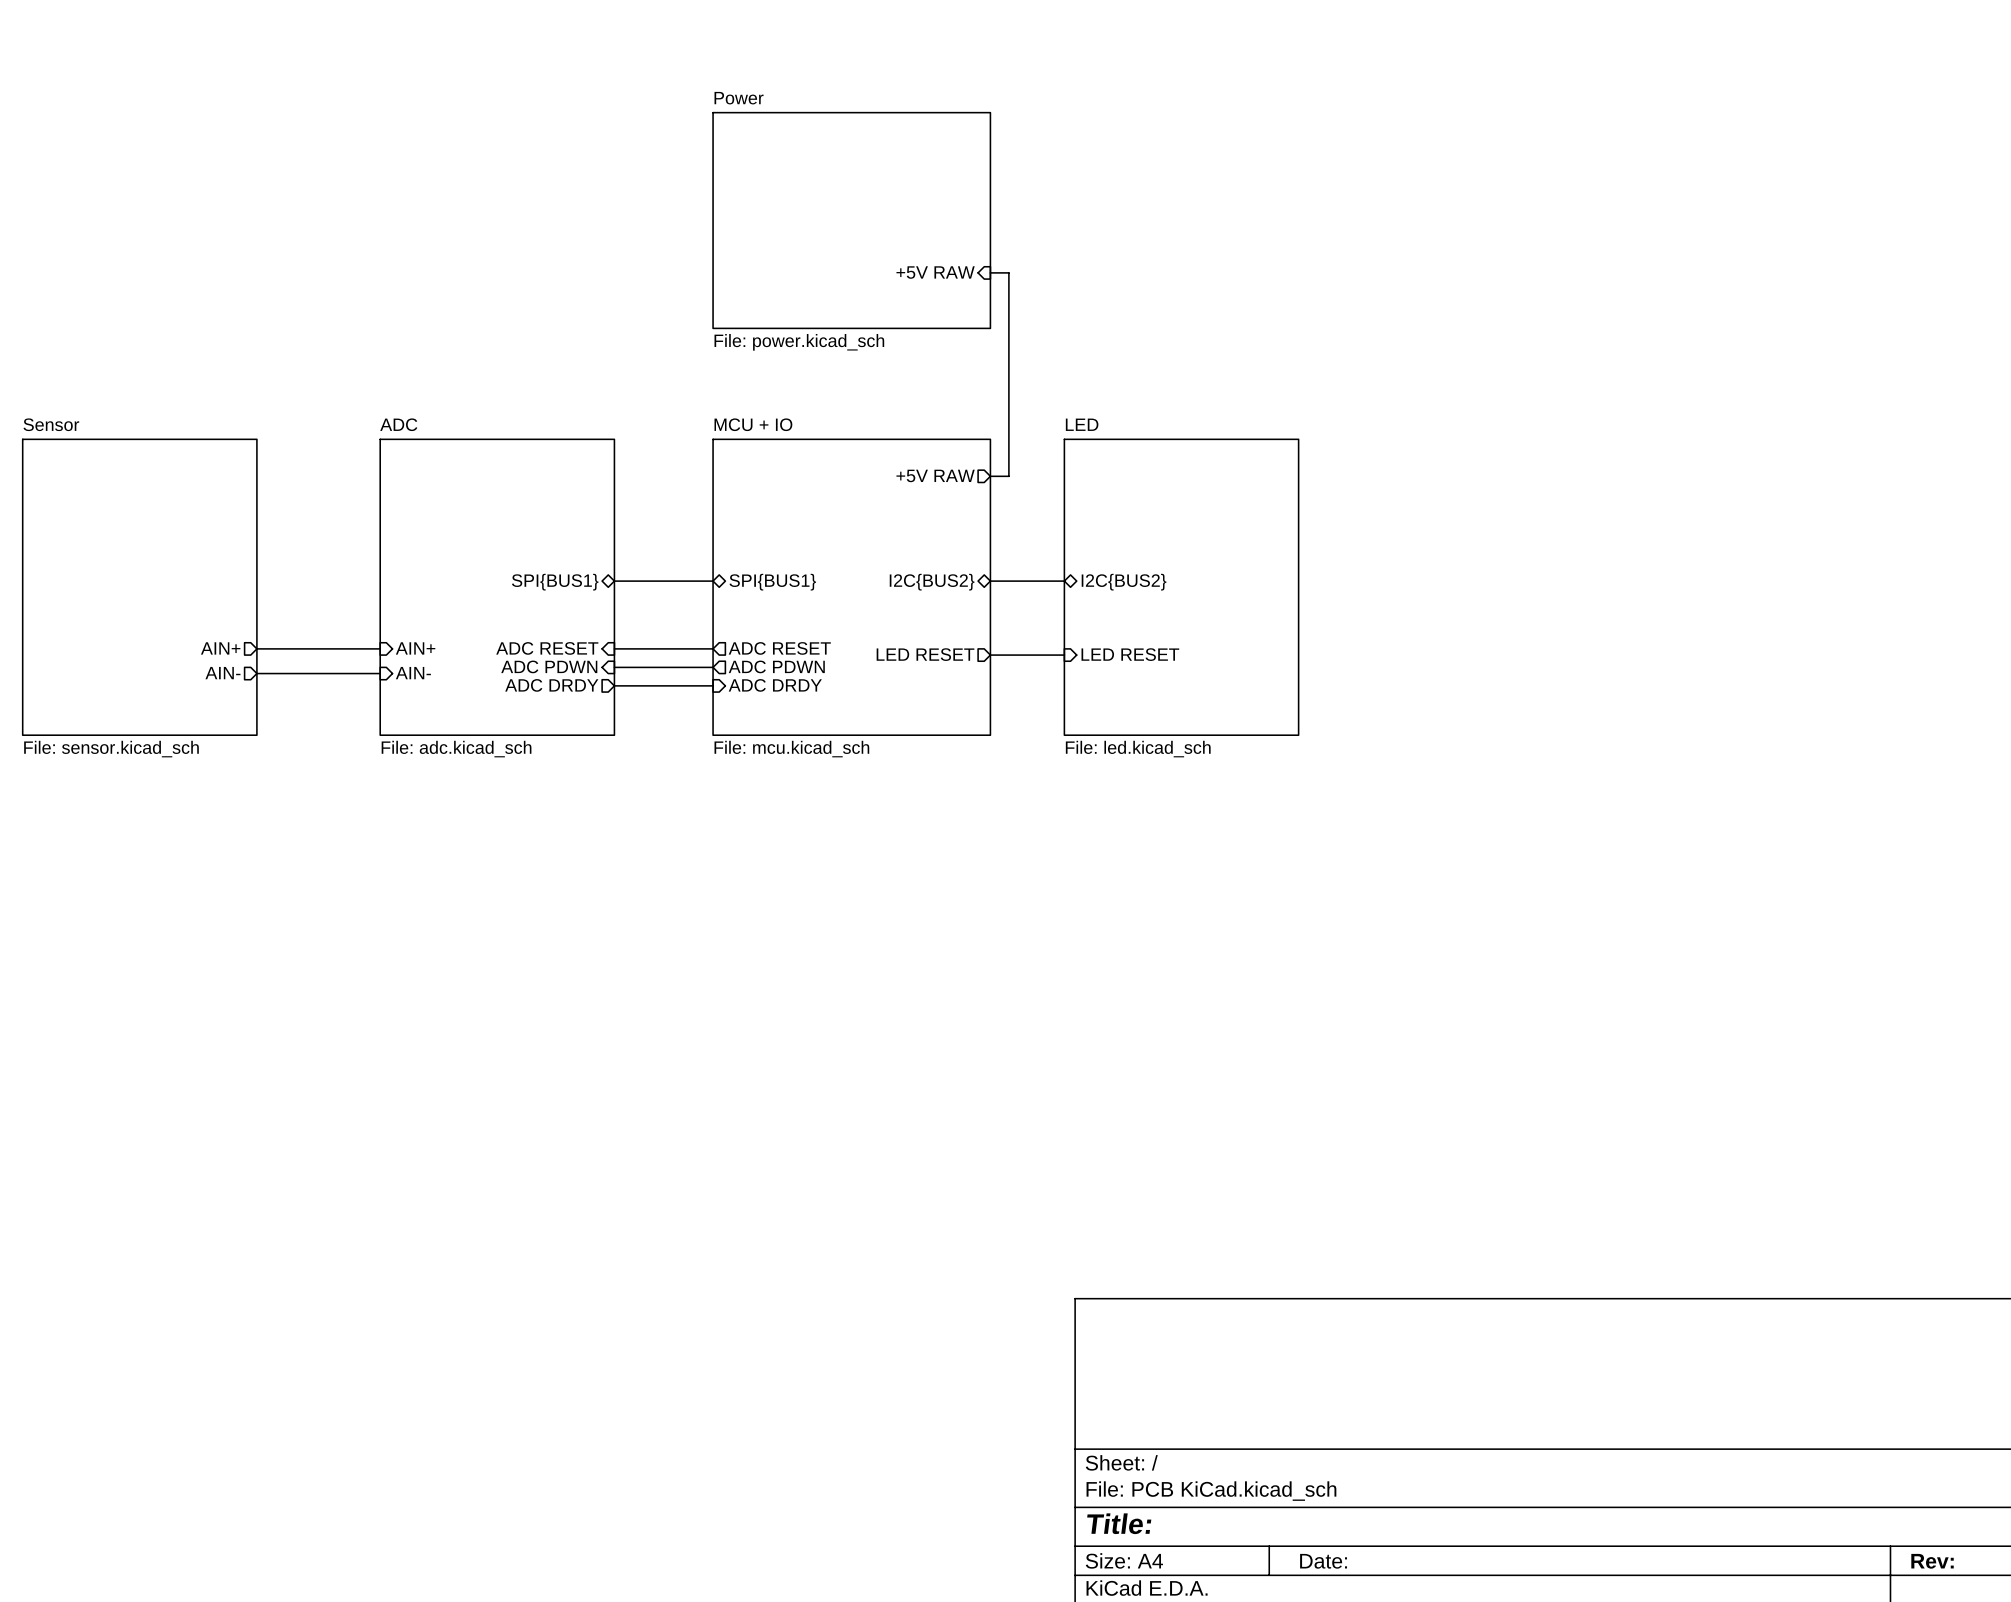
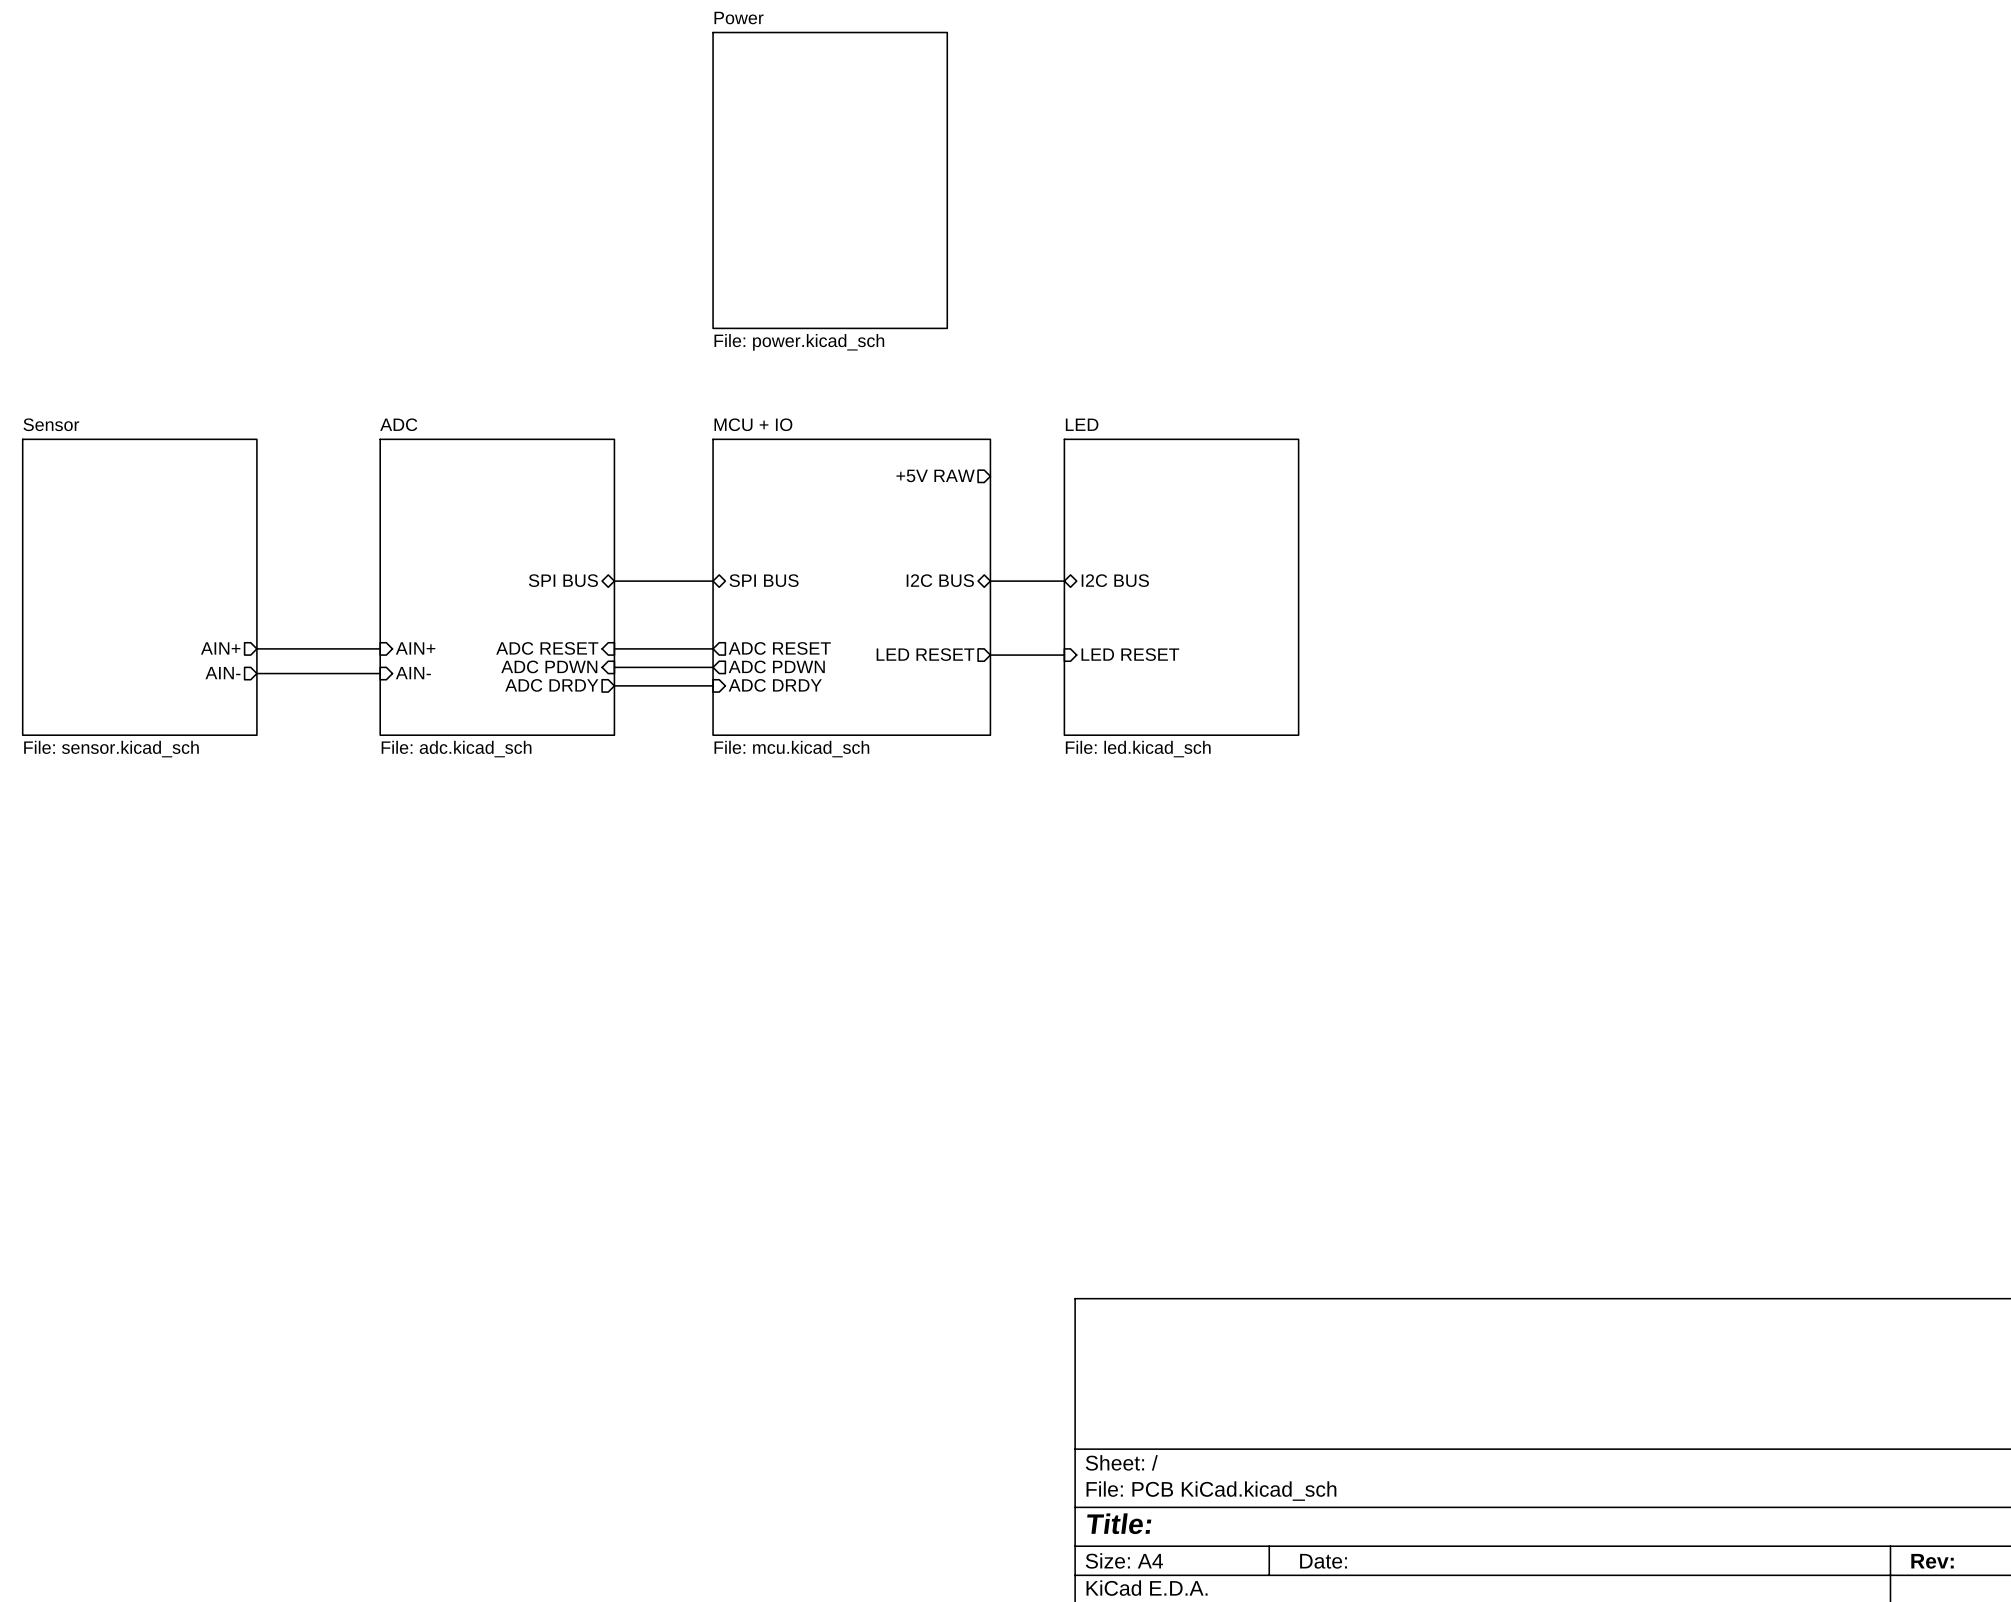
sheet Power: none -> File: power.kicad_sch (830, 180)
sheet Power: File: power.kicad_sch (851, 220) -> none
sheet pin: +5V RAW (935, 272) -> none
wire: (990, 272) (1008, 272) (1008, 476) (990, 476) -> none
sheet pin: SPI{BUS1} (555, 582) -> SPI BUS (563, 580)
sheet pin: SPI{BUS1} (772, 582) -> SPI BUS (764, 580)
sheet pin: I2C{BUS2} (932, 582) -> I2C BUS (940, 580)
sheet pin: I2C{BUS2} (1124, 582) -> I2C BUS (1115, 580)

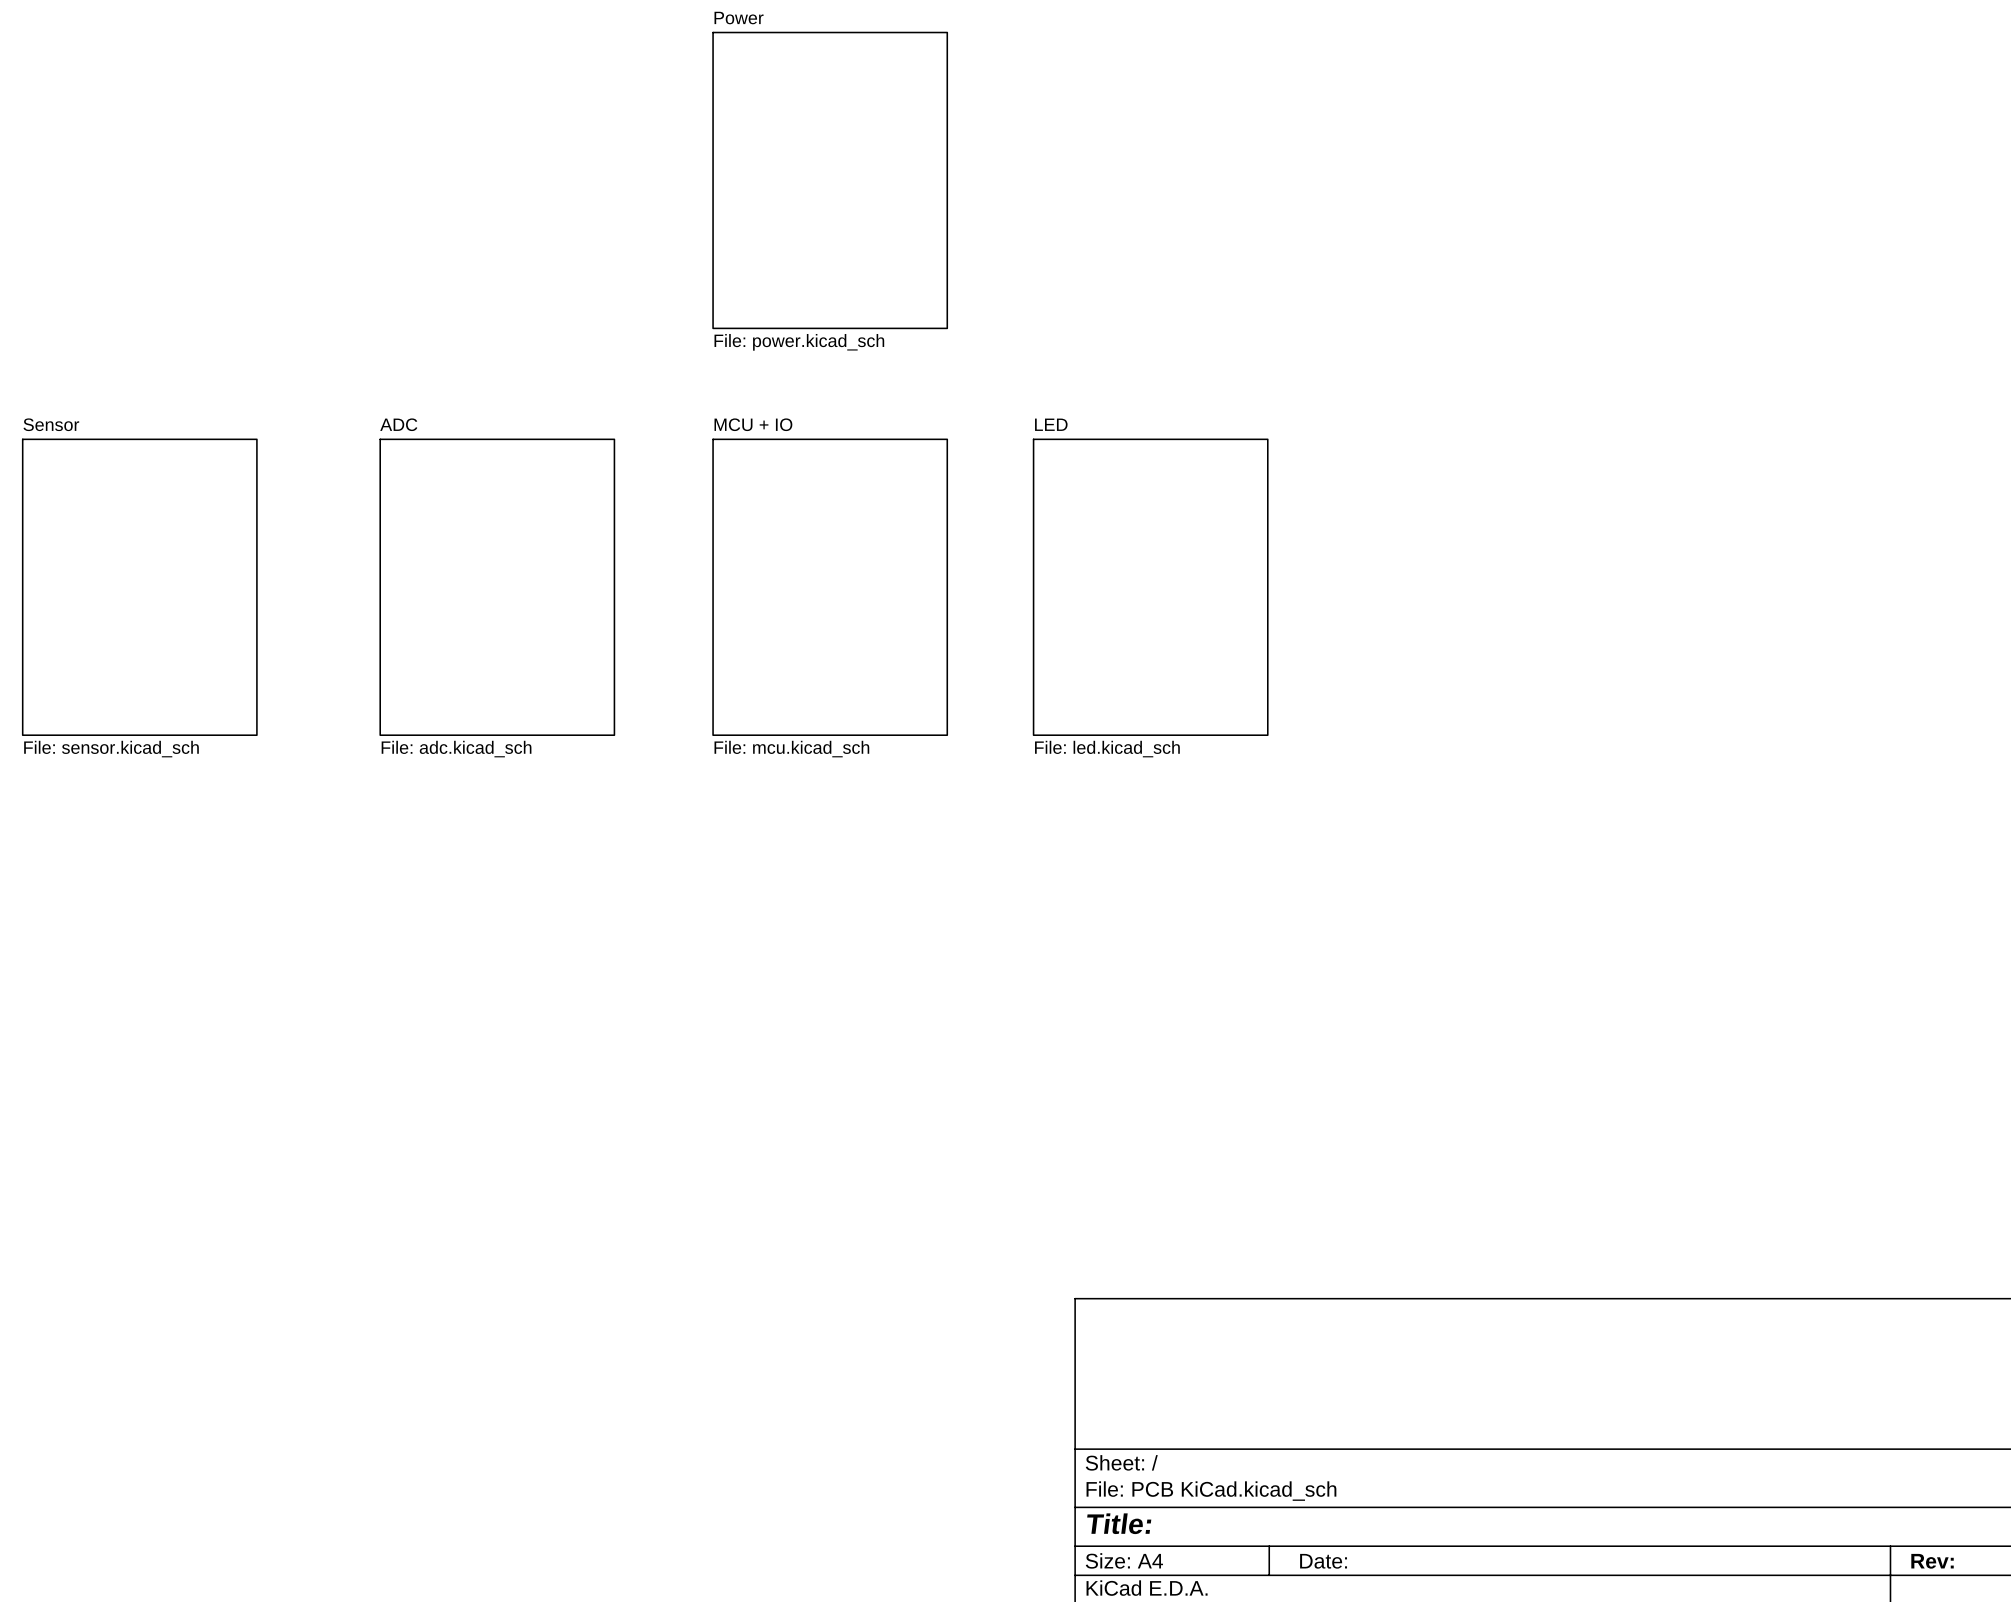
sheet pin: +5V RAW (935, 475) -> none
sheet pin: SPI BUS (563, 580) -> none
sheet pin: SPI BUS (764, 580) -> none
sheet pin: I2C BUS (940, 580) -> none
sheet pin: I2C BUS (1115, 580) -> none
wire: (614, 581) (713, 581) -> none
wire: (990, 581) (1064, 581) -> none
sheet MCU + IO: none -> File: mcu.kicad_sch (830, 587)
sheet MCU + IO: File: mcu.kicad_sch (851, 587) -> none
sheet LED position: (1181, 587) -> (1150, 587)
sheet pin: AIN+ (220, 648) -> none
wire: (256, 648) (380, 648) -> none
sheet pin: AIN+ (415, 648) -> none
sheet pin: ADC RESET (547, 648) -> none
wire: (614, 648) (713, 648) -> none
sheet pin: ADC RESET (779, 648) -> none
sheet pin: LED RESET (925, 654) -> none
sheet pin: LED RESET (1130, 654) -> none
wire: (990, 655) (1064, 655) -> none
sheet pin: ADC PDWN (549, 666) -> none
sheet pin: ADC PDWN (776, 666) -> none
wire: (614, 667) (713, 667) -> none
sheet pin: AIN- (222, 673) -> none
wire: (256, 673) (380, 673) -> none
sheet pin: AIN- (413, 673) -> none
sheet pin: ADC DRDY (551, 685) -> none
wire: (614, 685) (713, 685) -> none
sheet pin: ADC DRDY (775, 685) -> none

